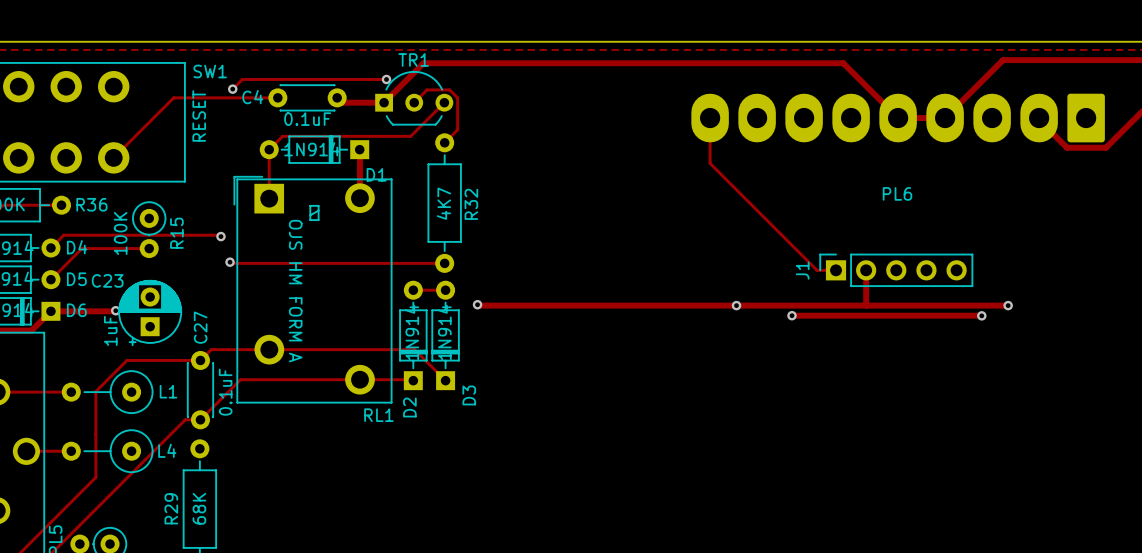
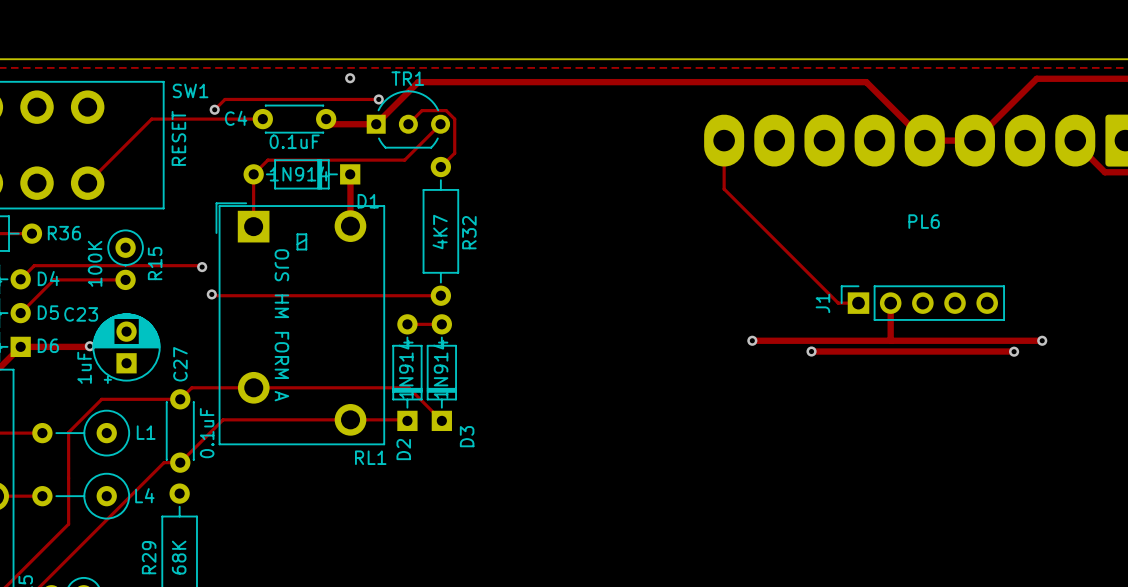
via: none -> (350, 78)
track: (477, 304) (736, 305) -> none
via: (477, 304) -> none

